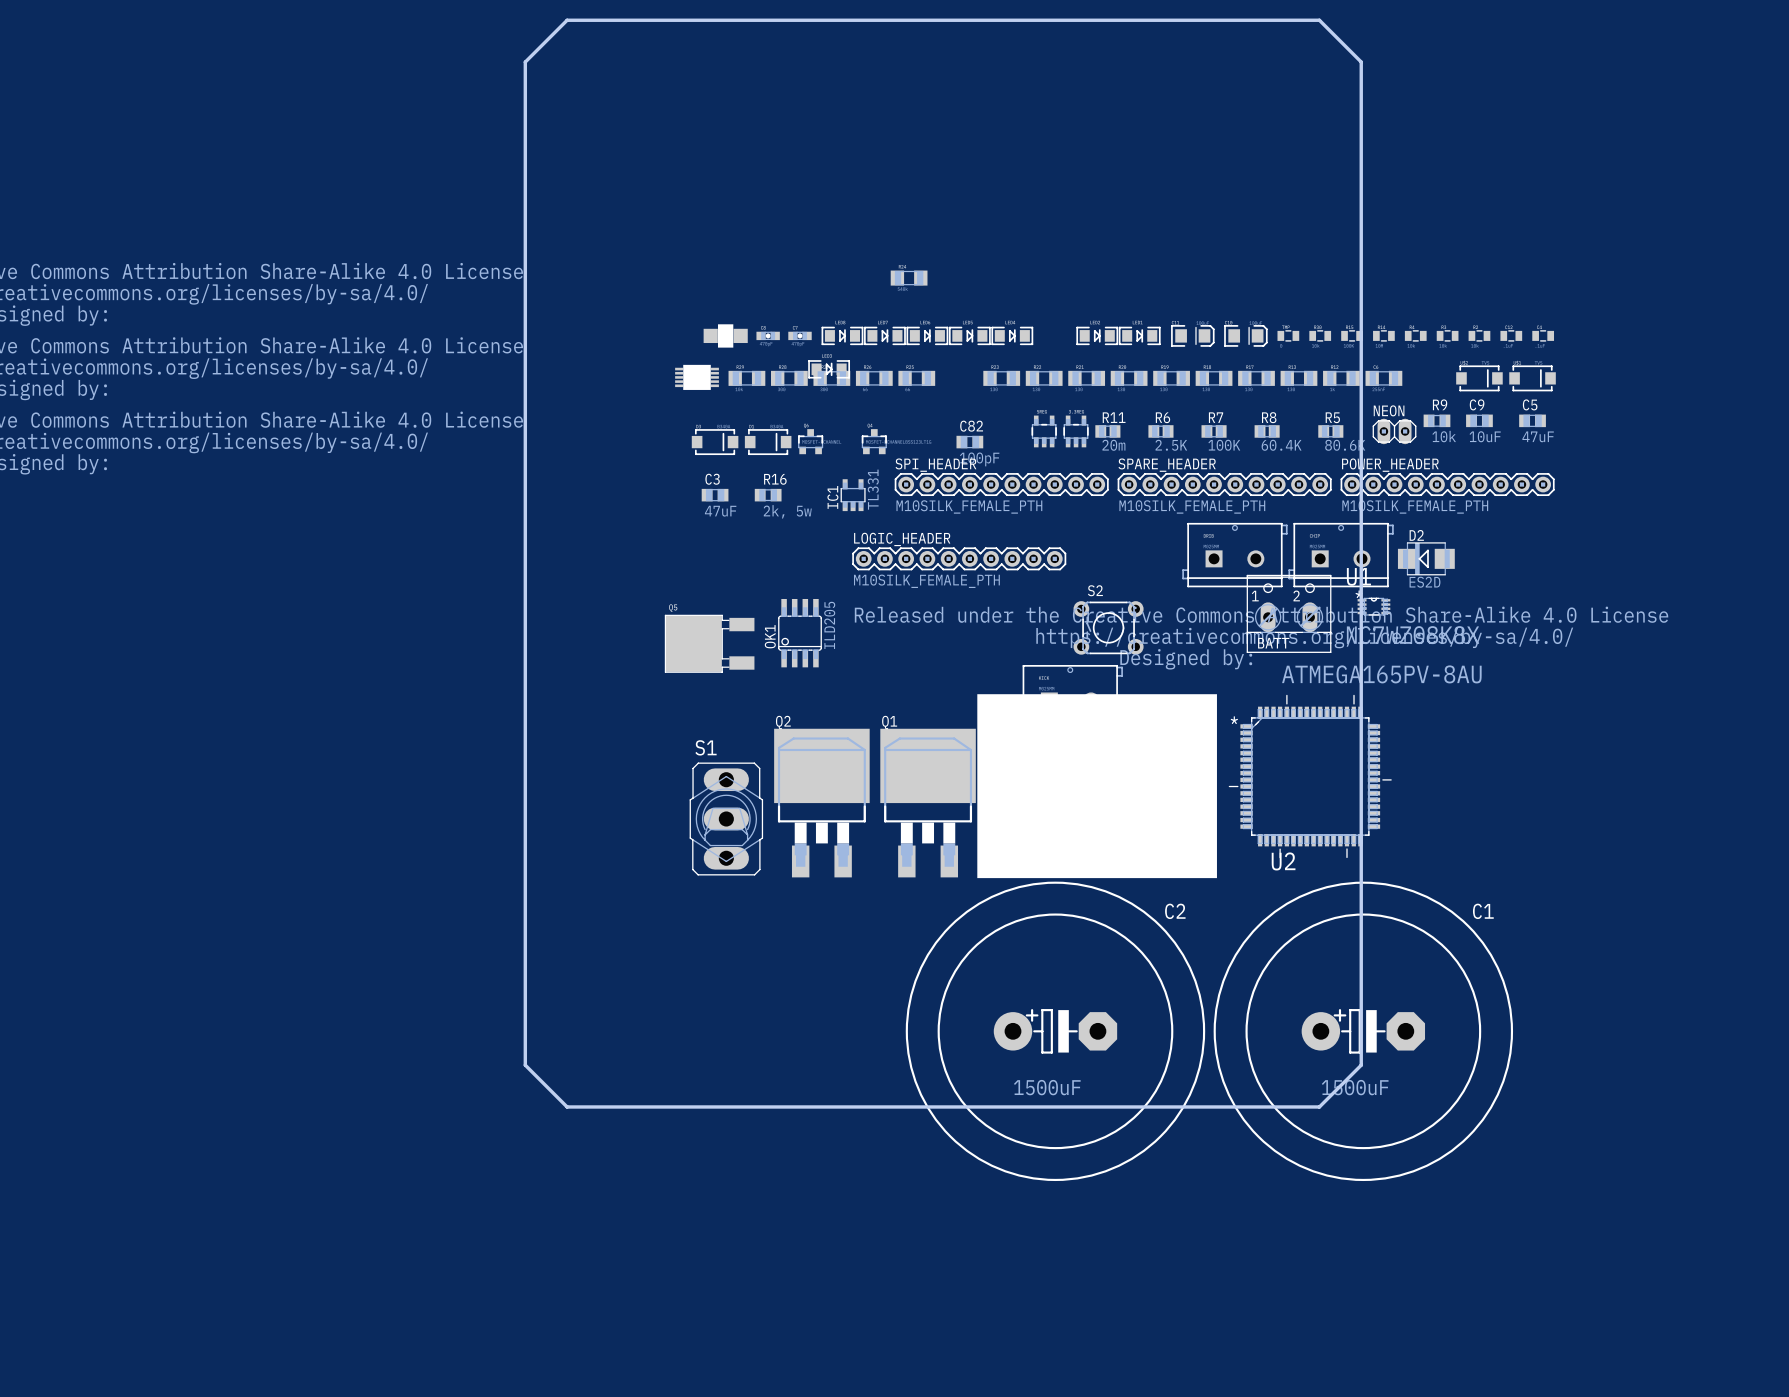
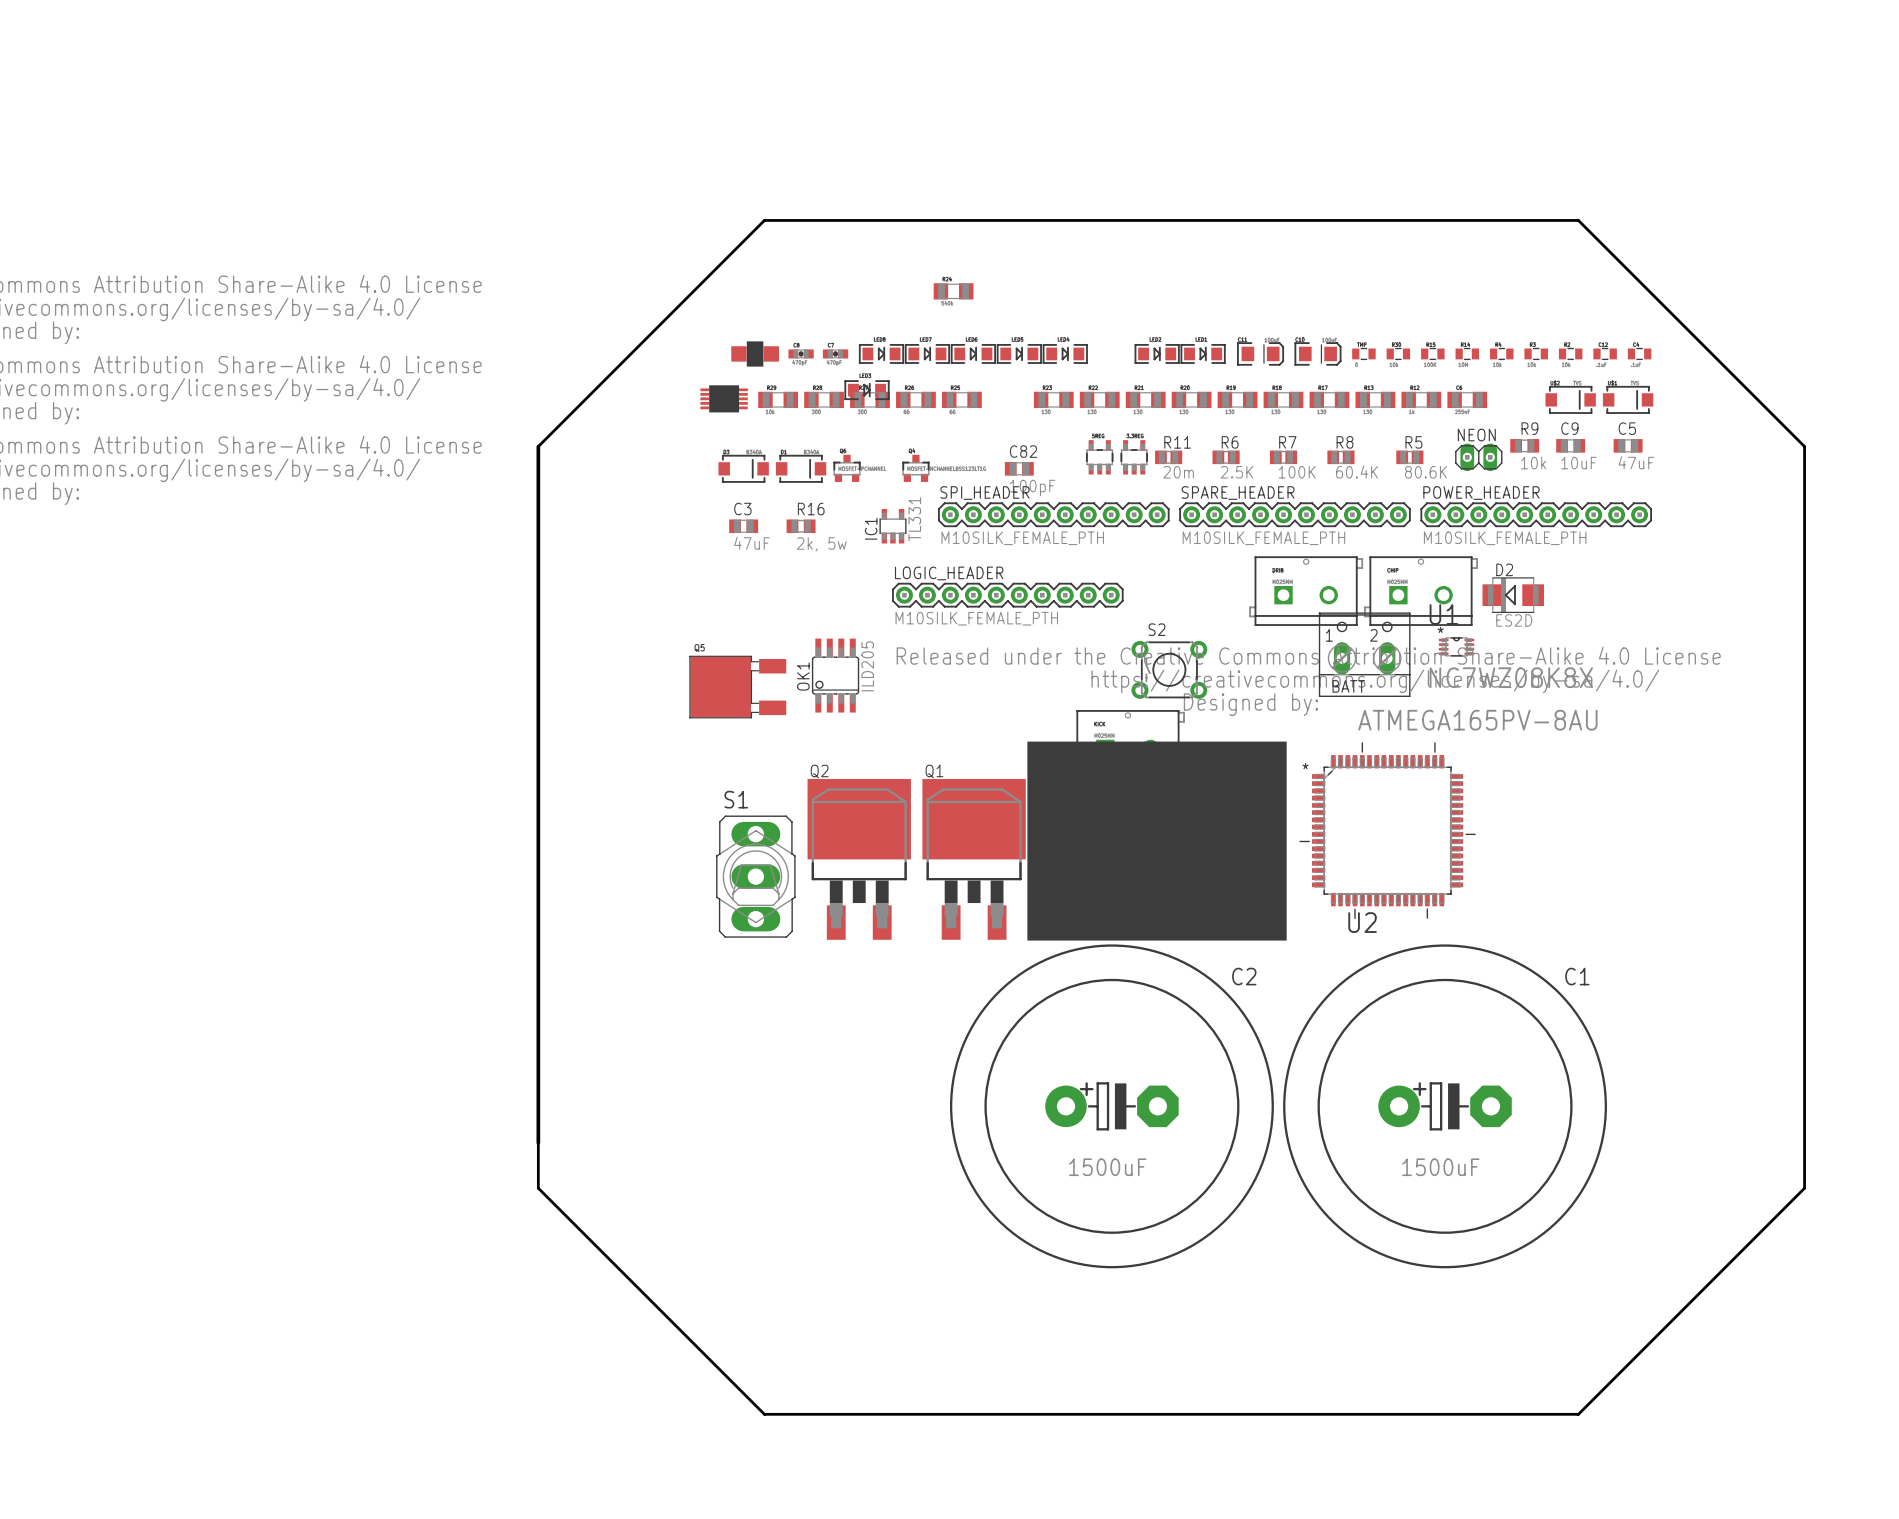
board edge: (525, 421) (525, 62) (567, 20) (1319, 20) (1361, 62) (1361, 1065) (1319, 1106) (567, 1106) (525, 1065) -> (538, 446) (764, 220) (1578, 220) (1804, 446) (1804, 1188) (1578, 1414) (764, 1414) (538, 1188) (538, 1142)

